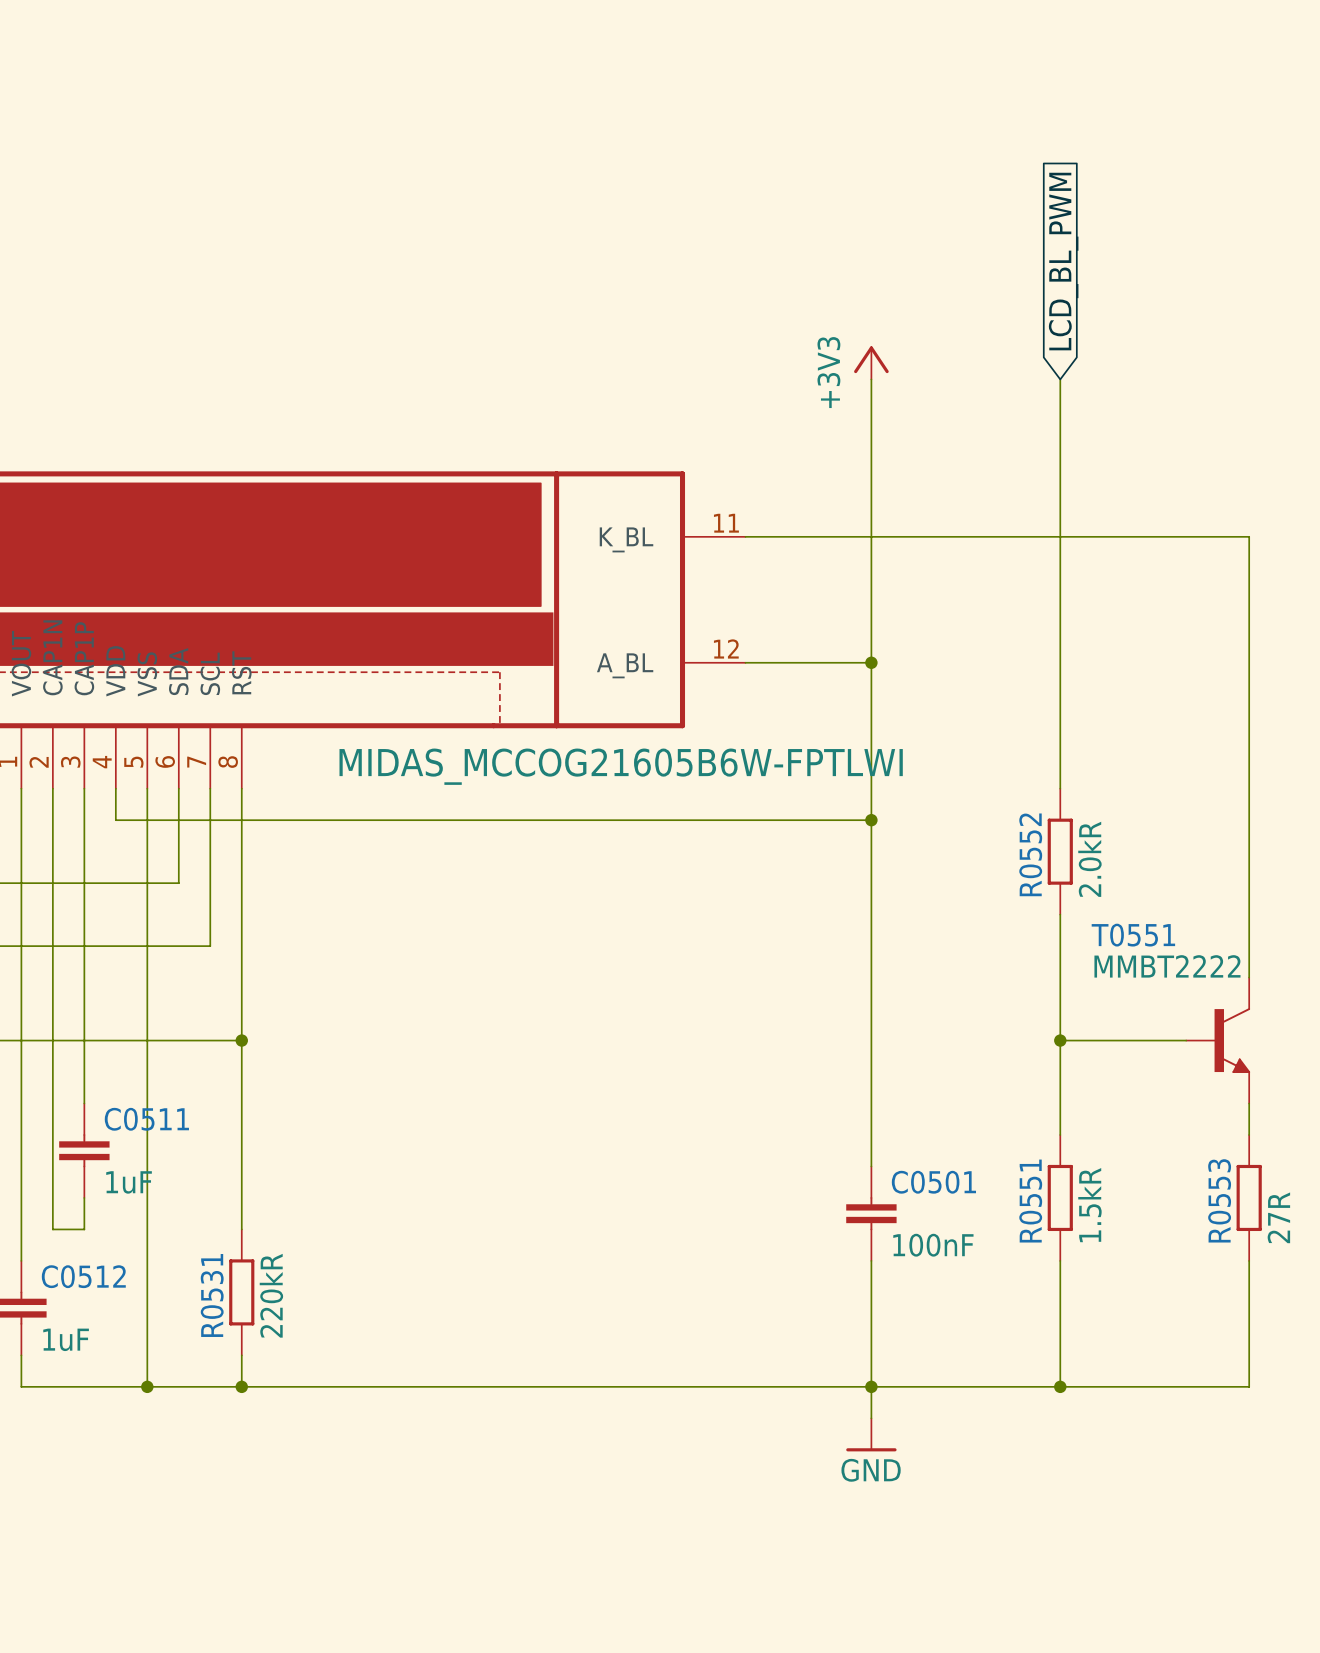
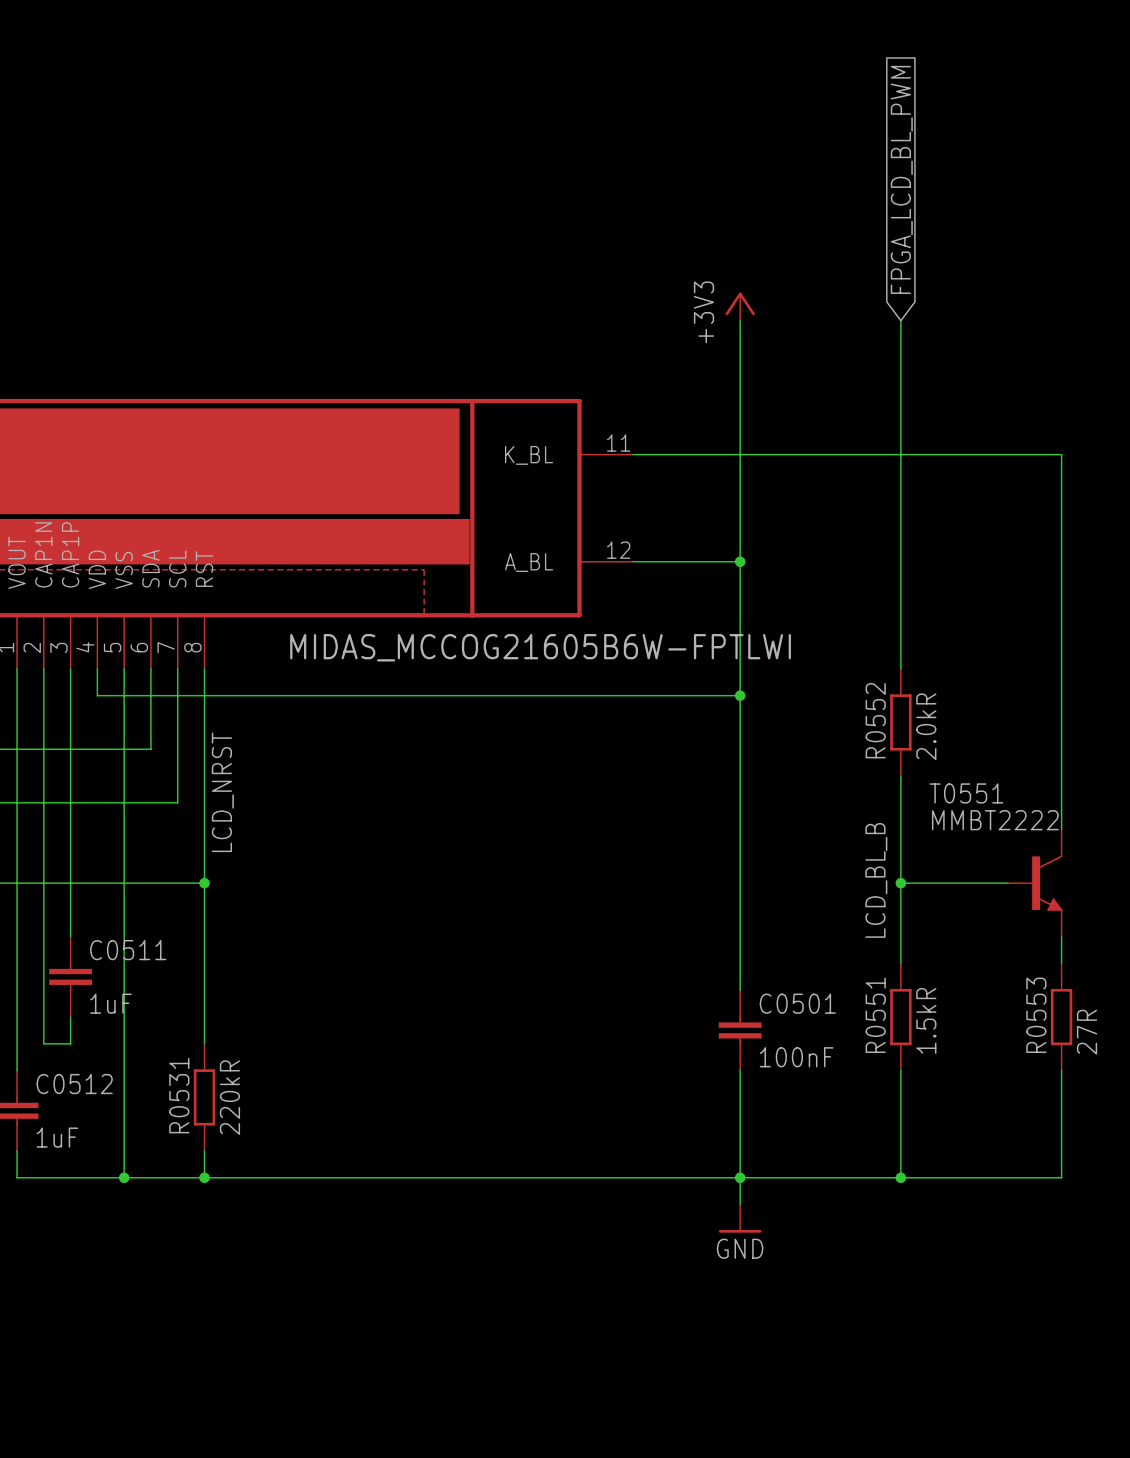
global label: LCD_BL_PWM (1063, 261) -> FPGA_LCD_BL_PWM (901, 179)
label: none -> LCD_NRST (222, 792)
label: none -> LCD_BL_B (876, 880)

